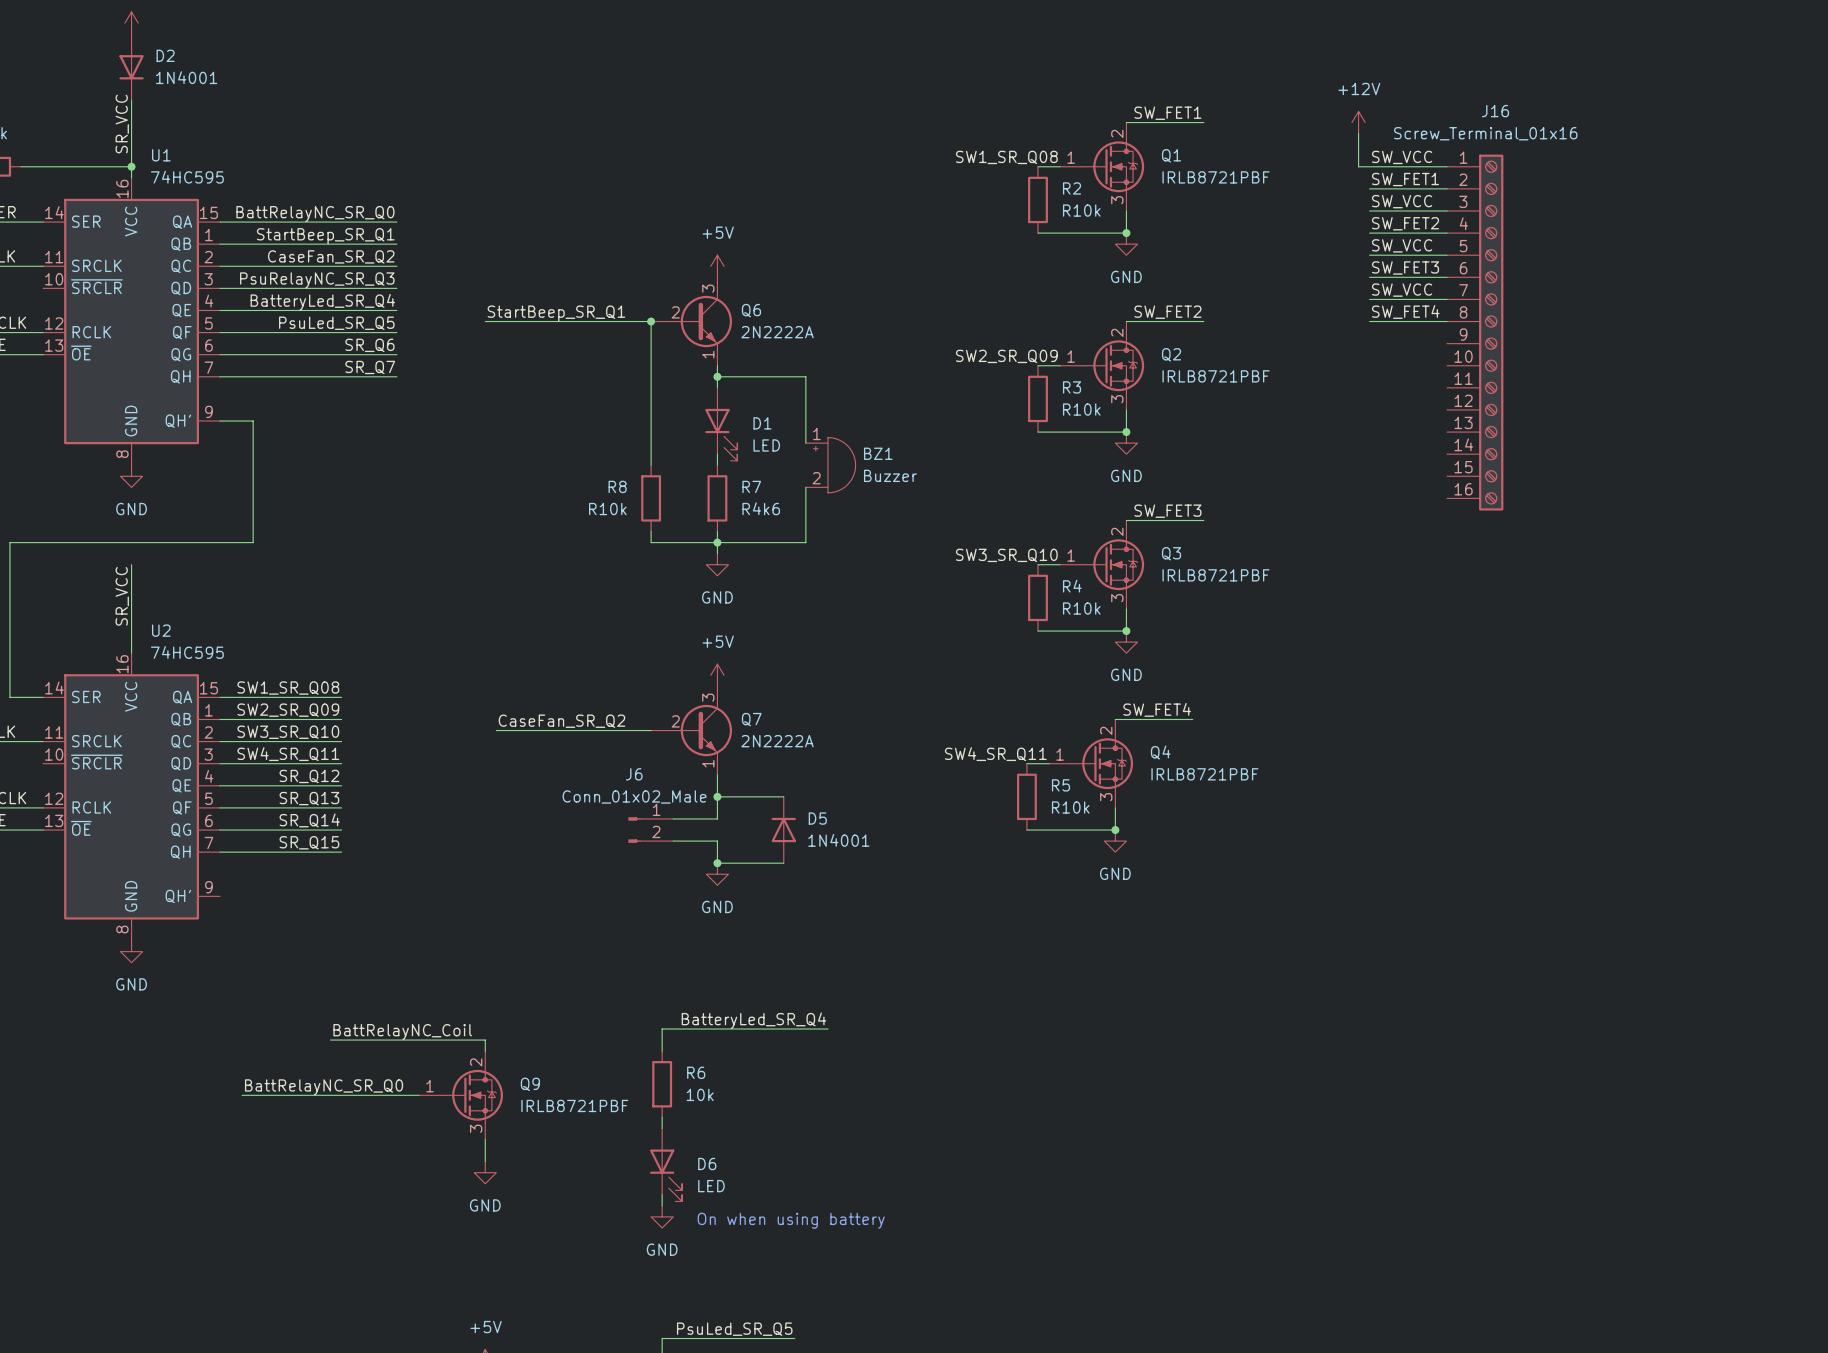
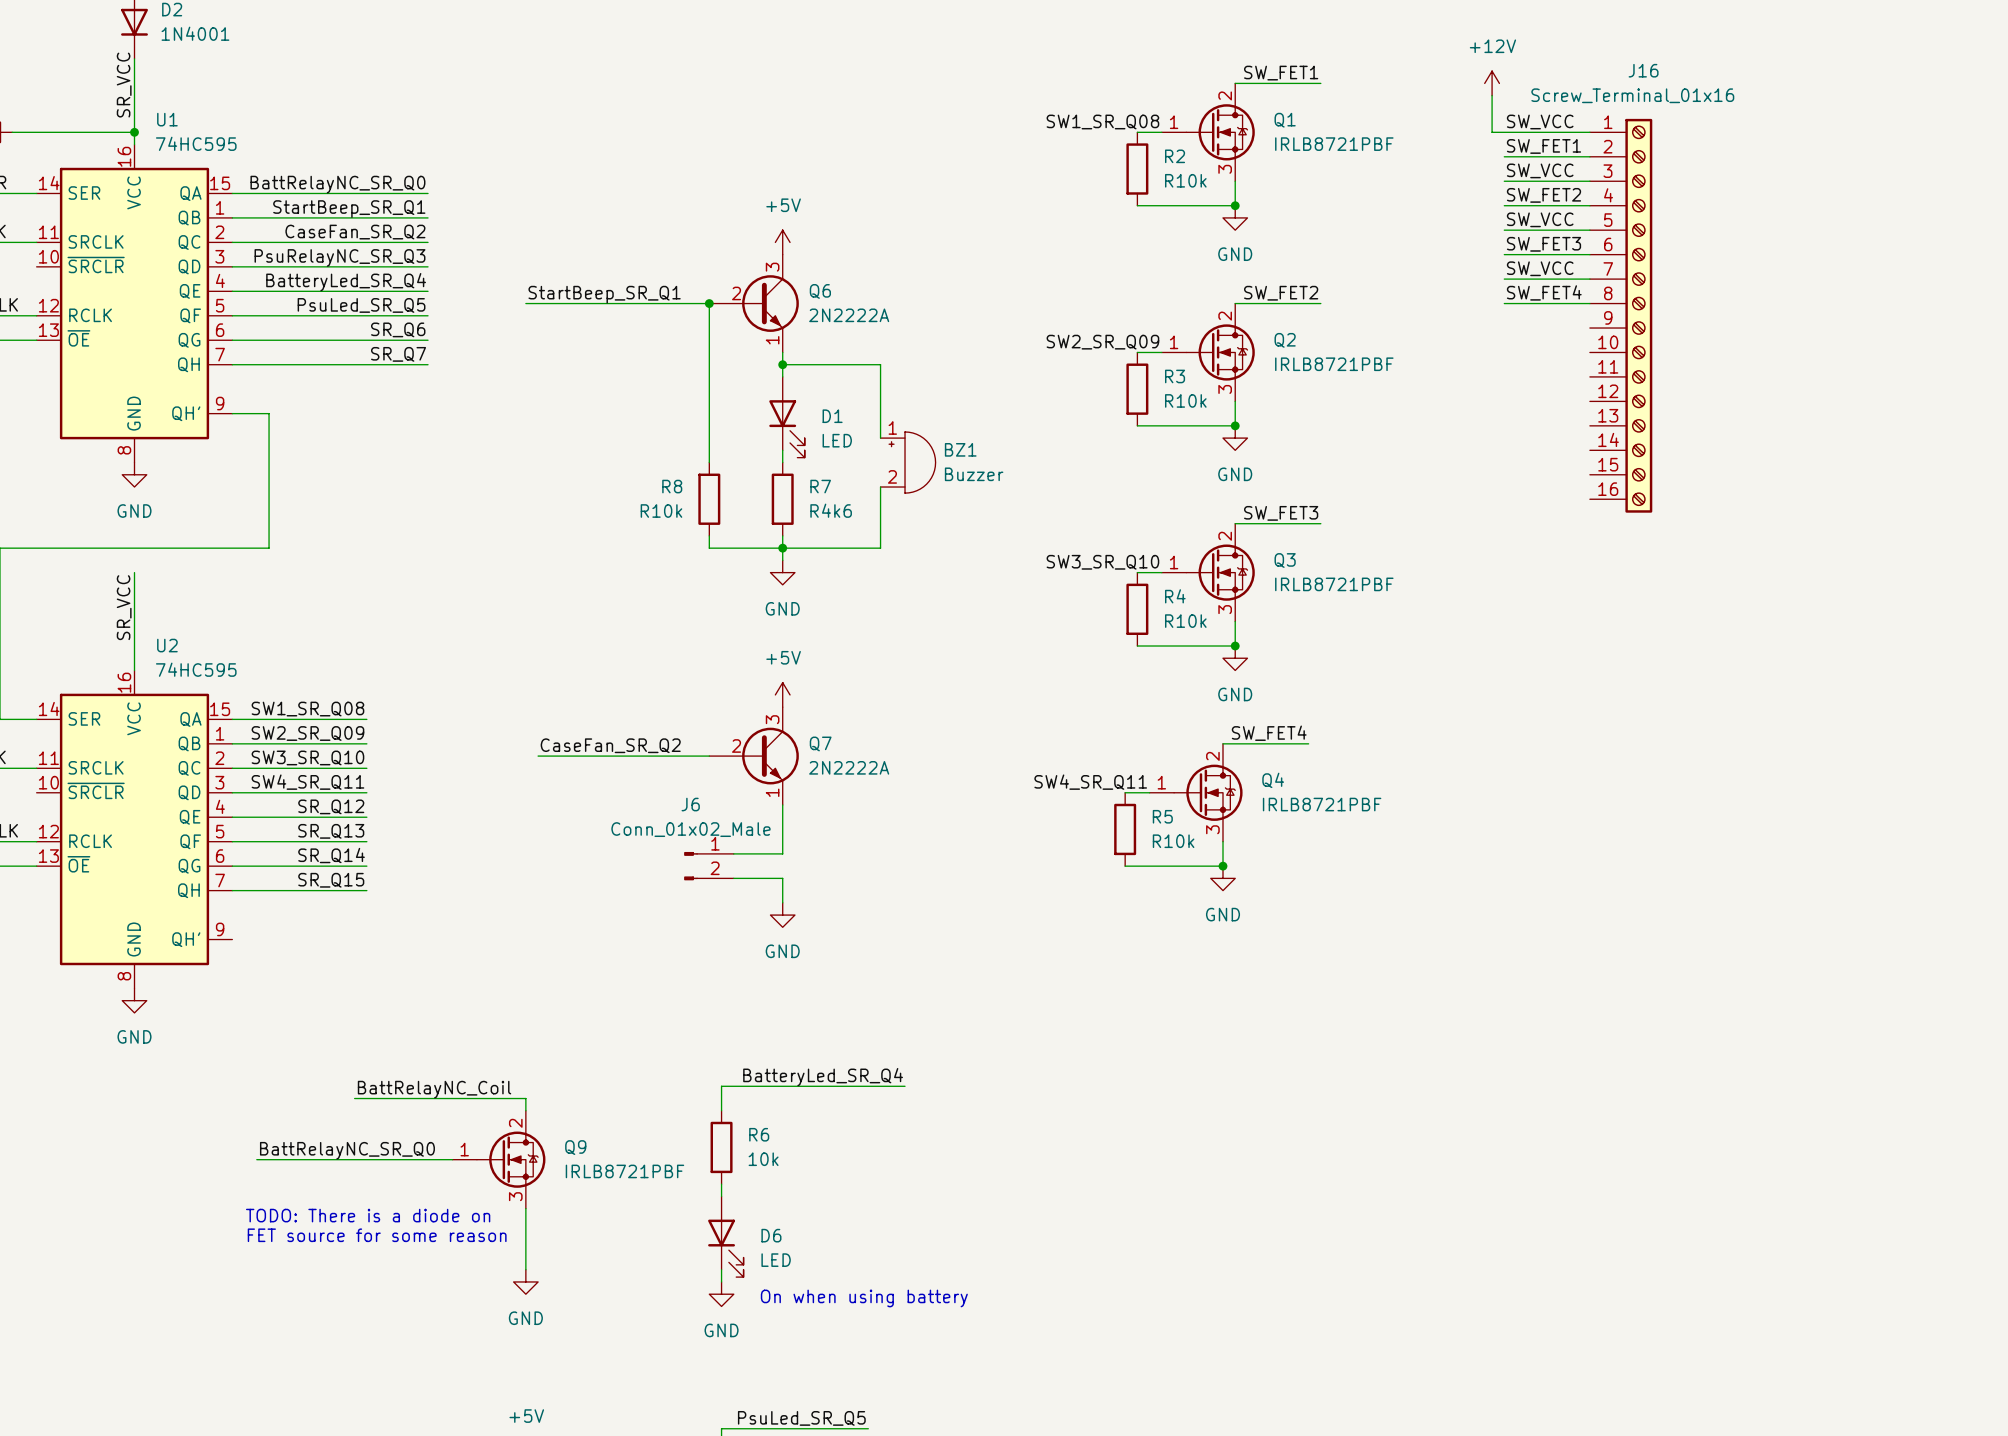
wire: (717, 796) (783, 796) -> none
junction: (717, 796) -> none
D5: 1N4001 (783, 830) -> none
wire: (717, 863) (783, 863) -> none
junction: (717, 863) -> none
text: none -> TODO: There is a diode on (368, 1215)
wire: none -> (525, 1233) (525, 1269)
text: none -> FET source for some reason (377, 1235)
power symbol position: GND (485, 1172) -> GND (525, 1281)

